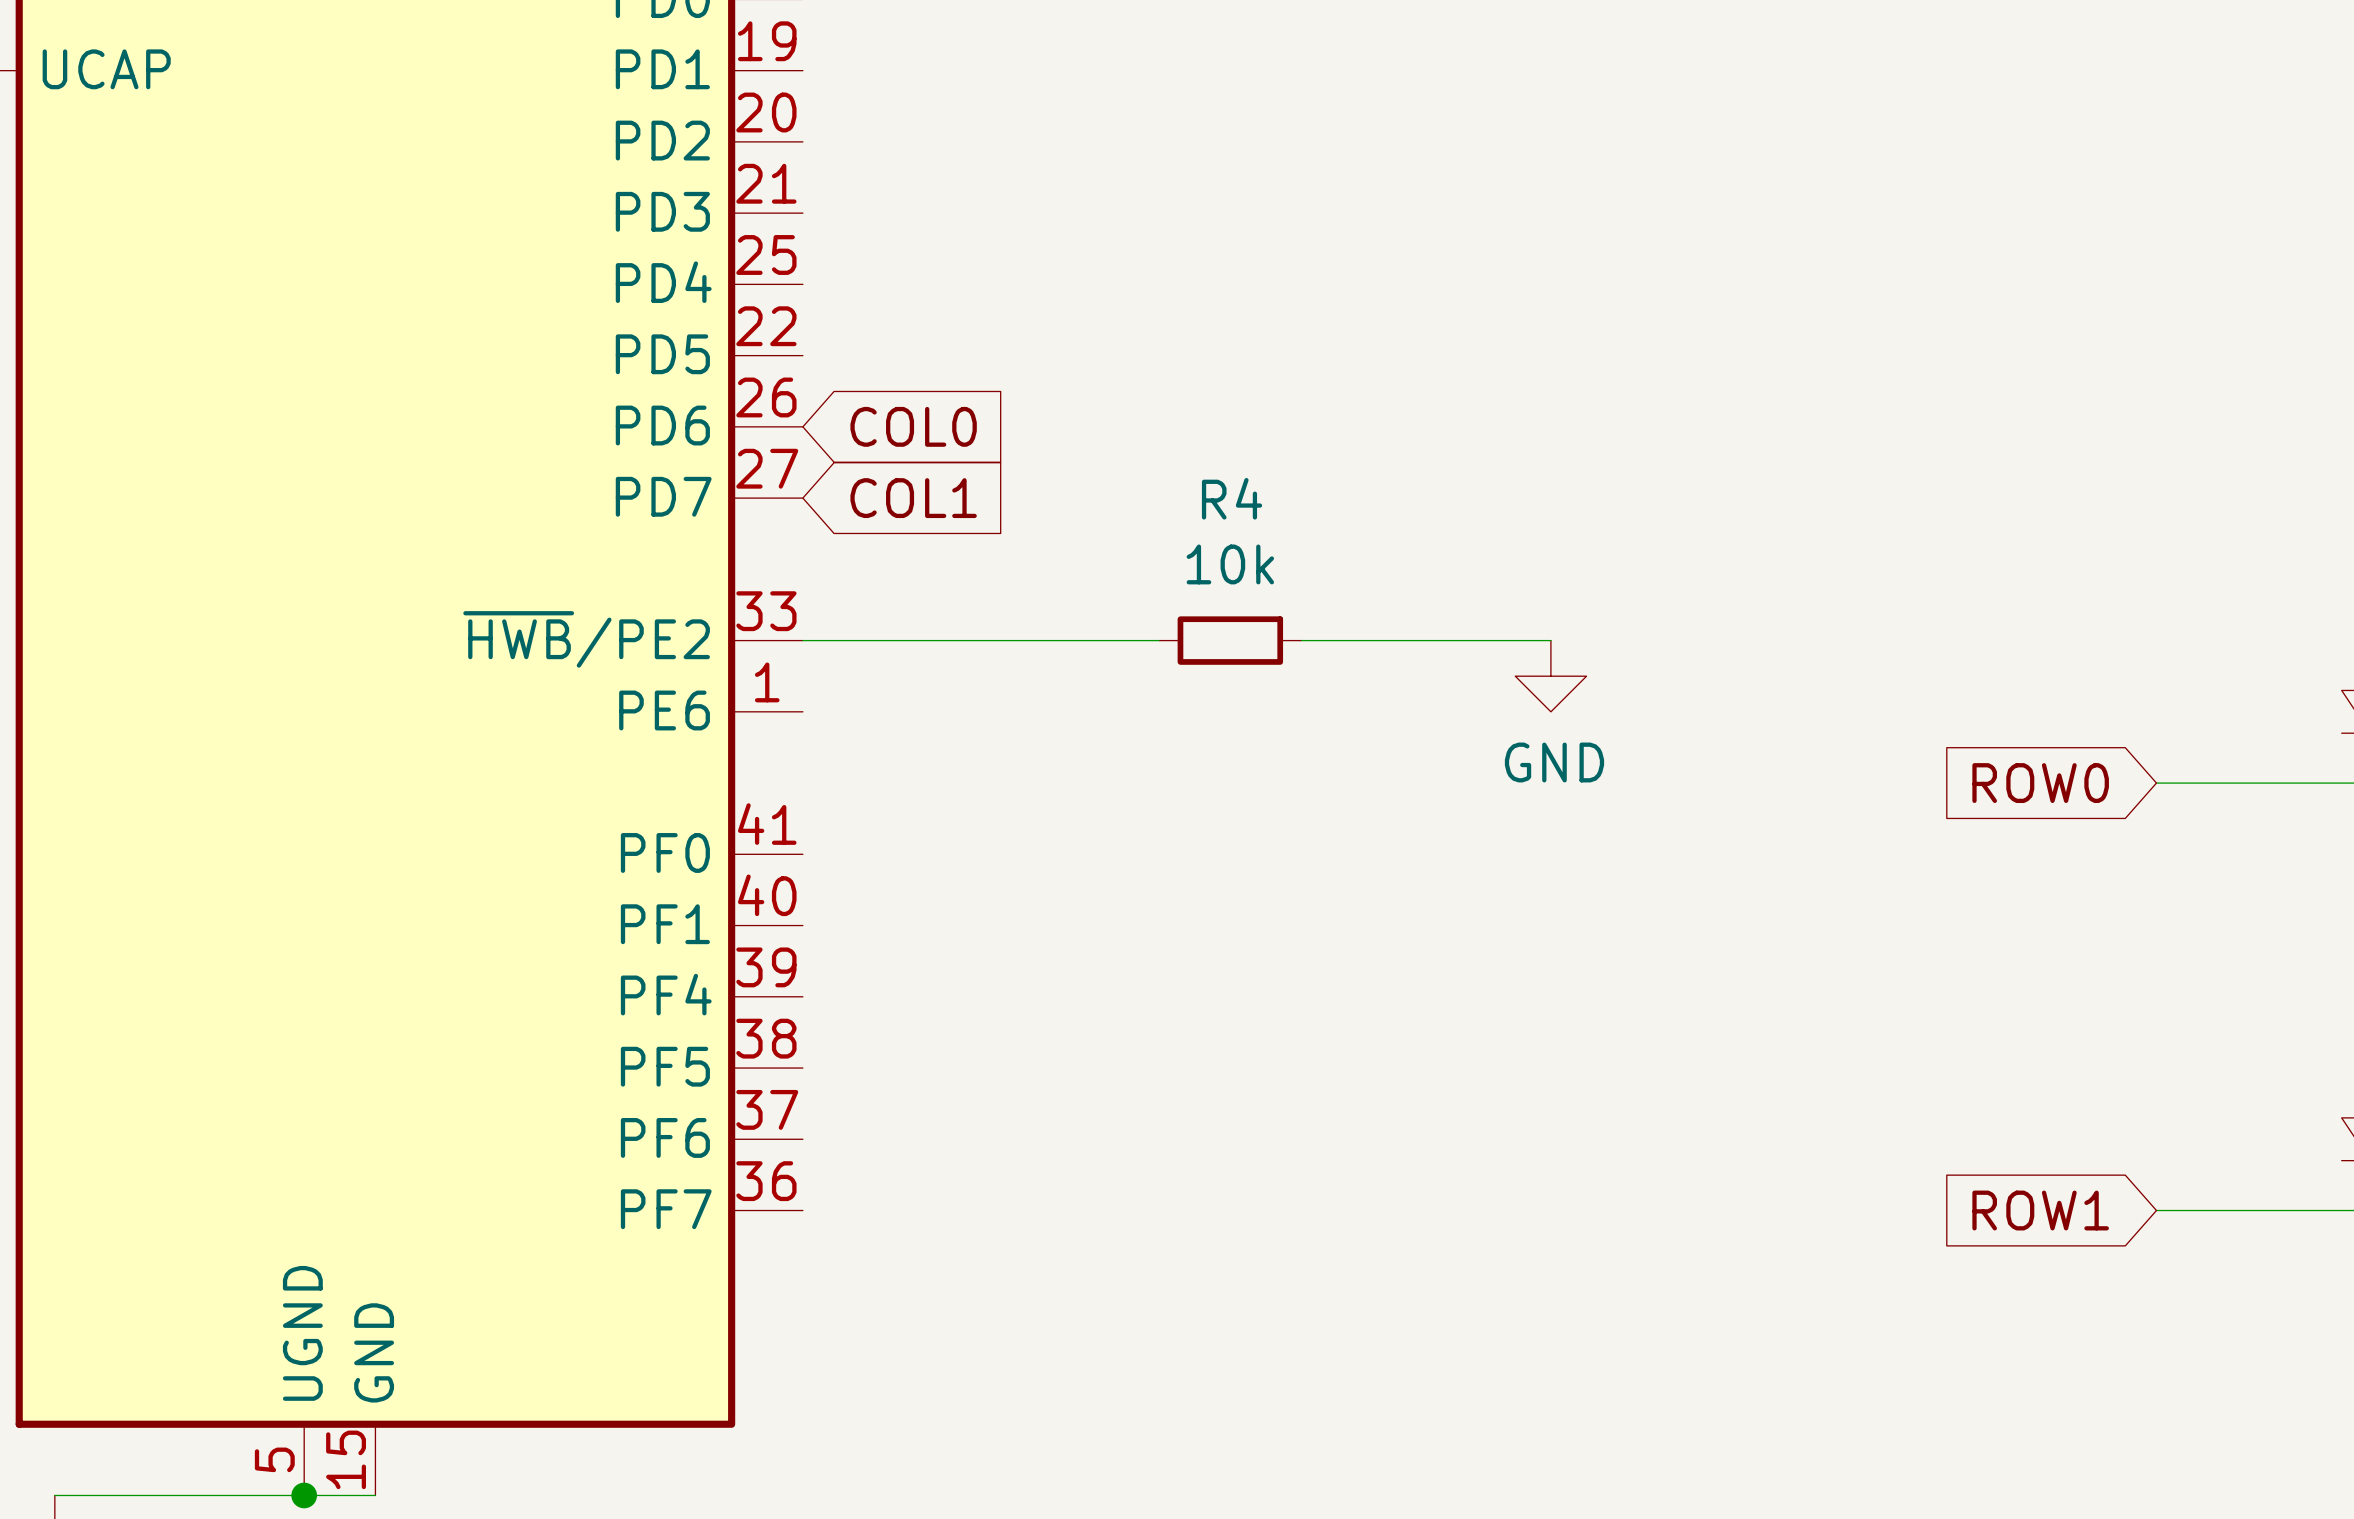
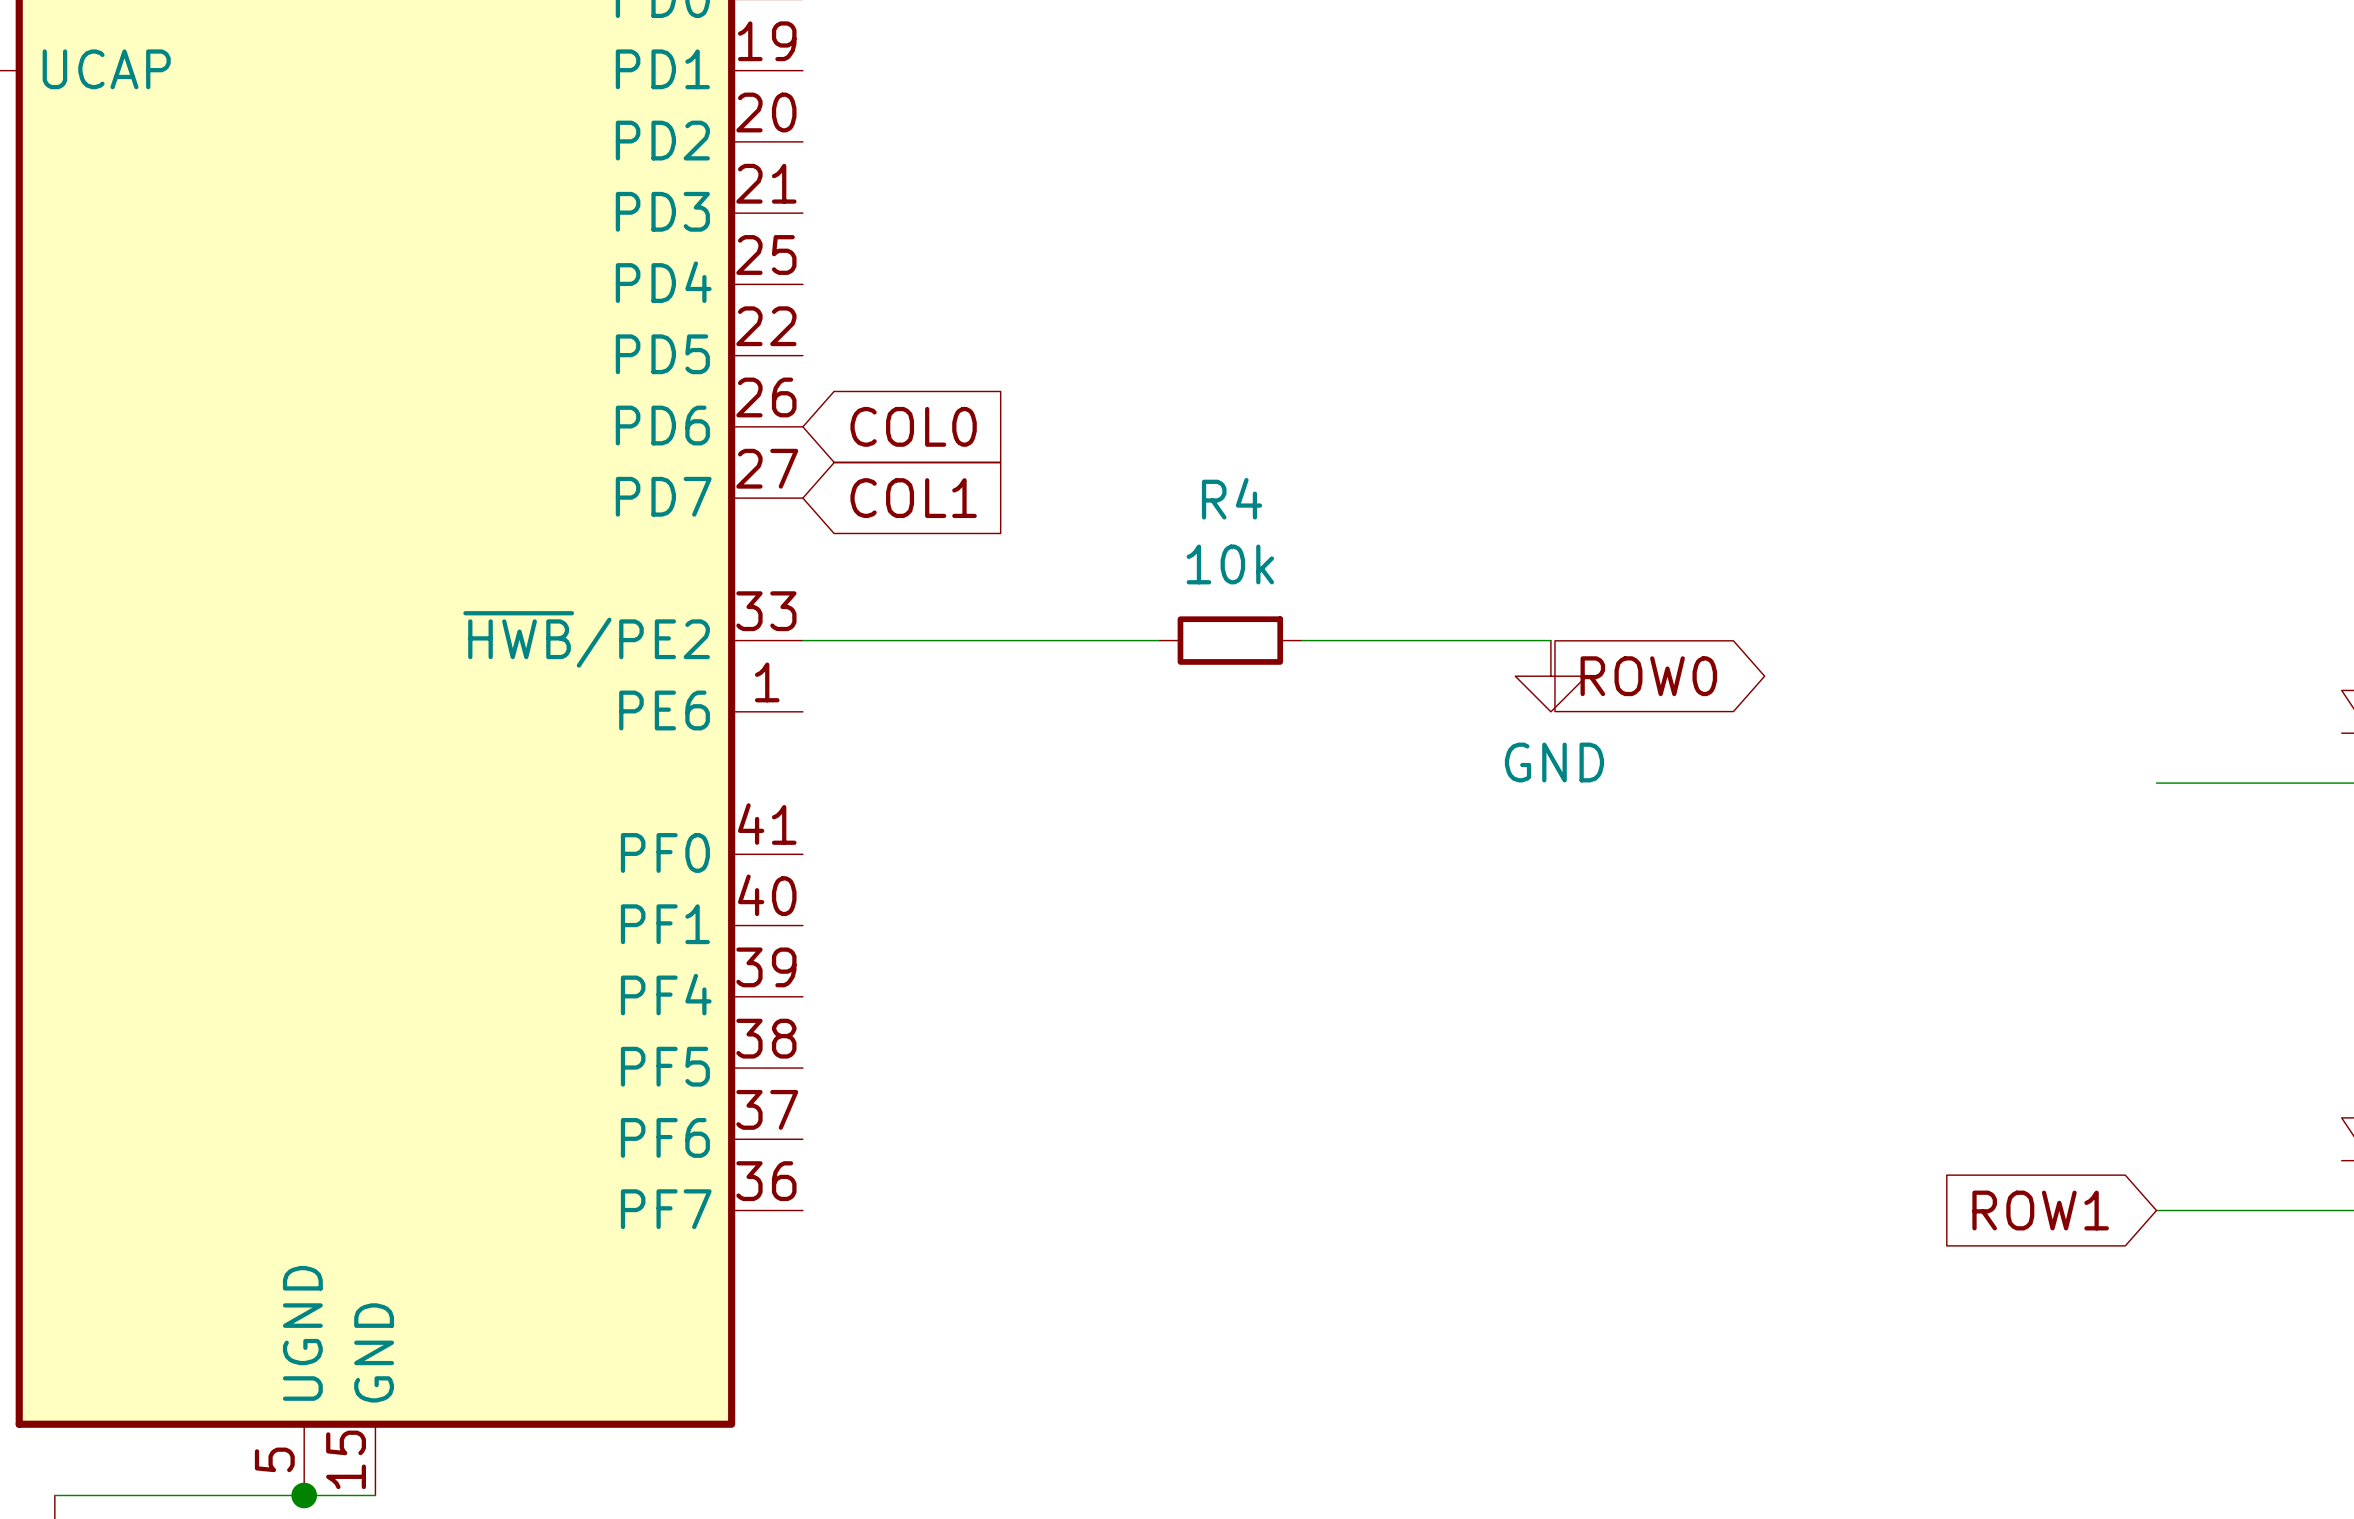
global label position: ROW0 (2040, 783) -> ROW0 (1648, 676)

